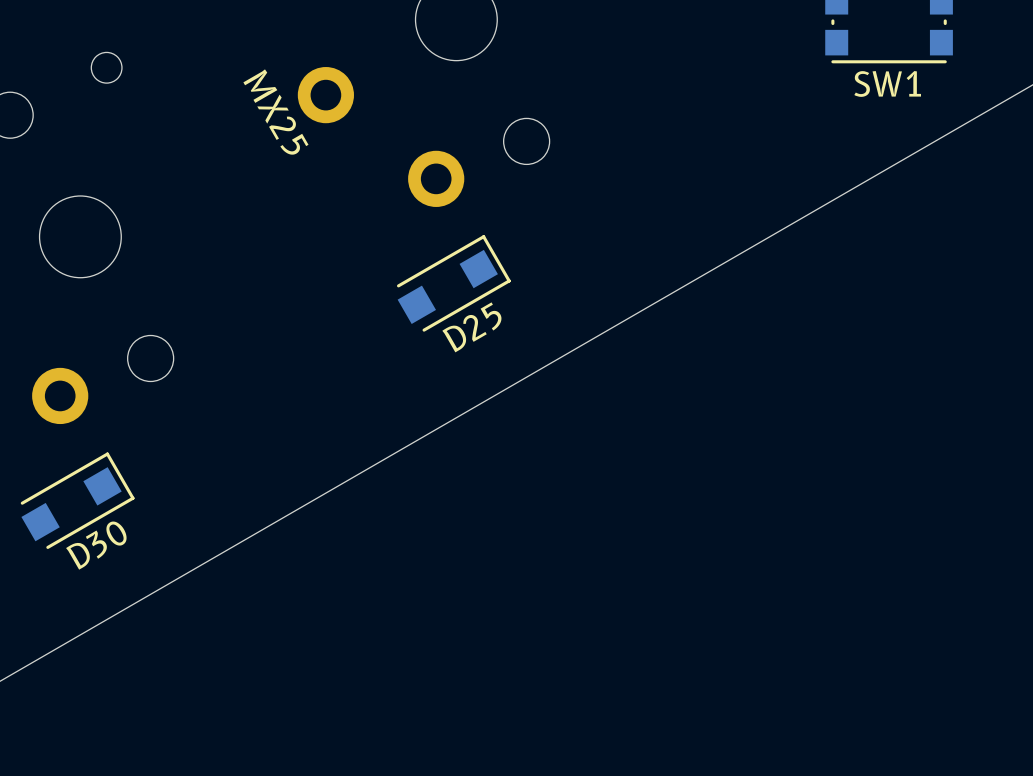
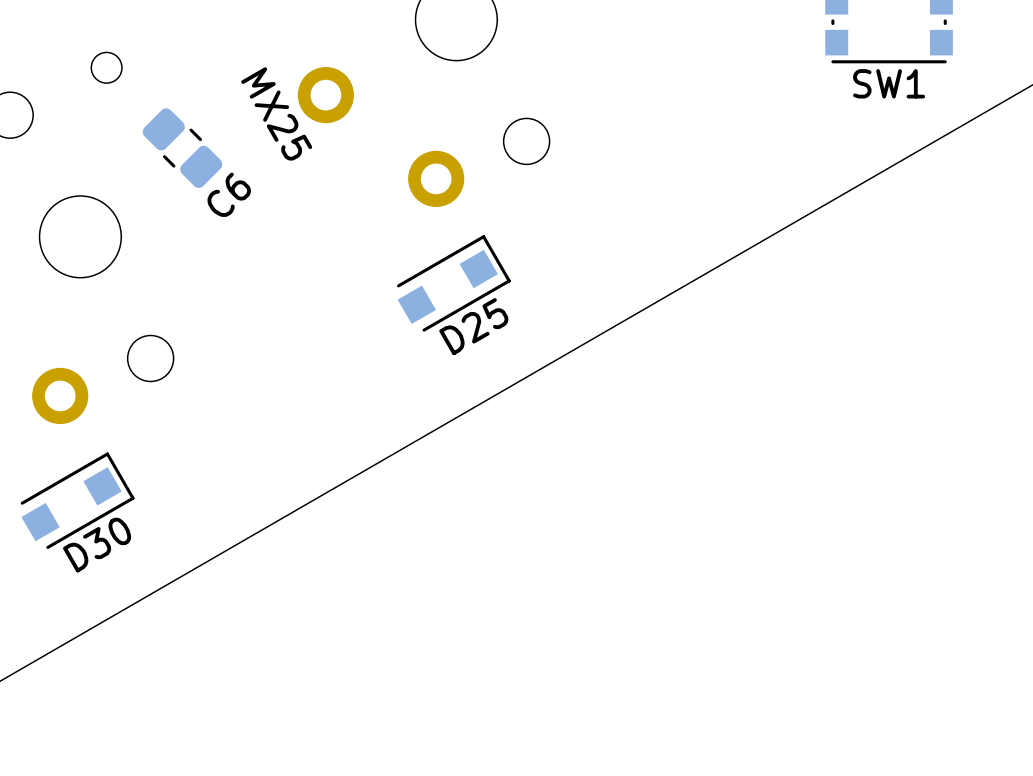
C6: none -> (182, 148)

